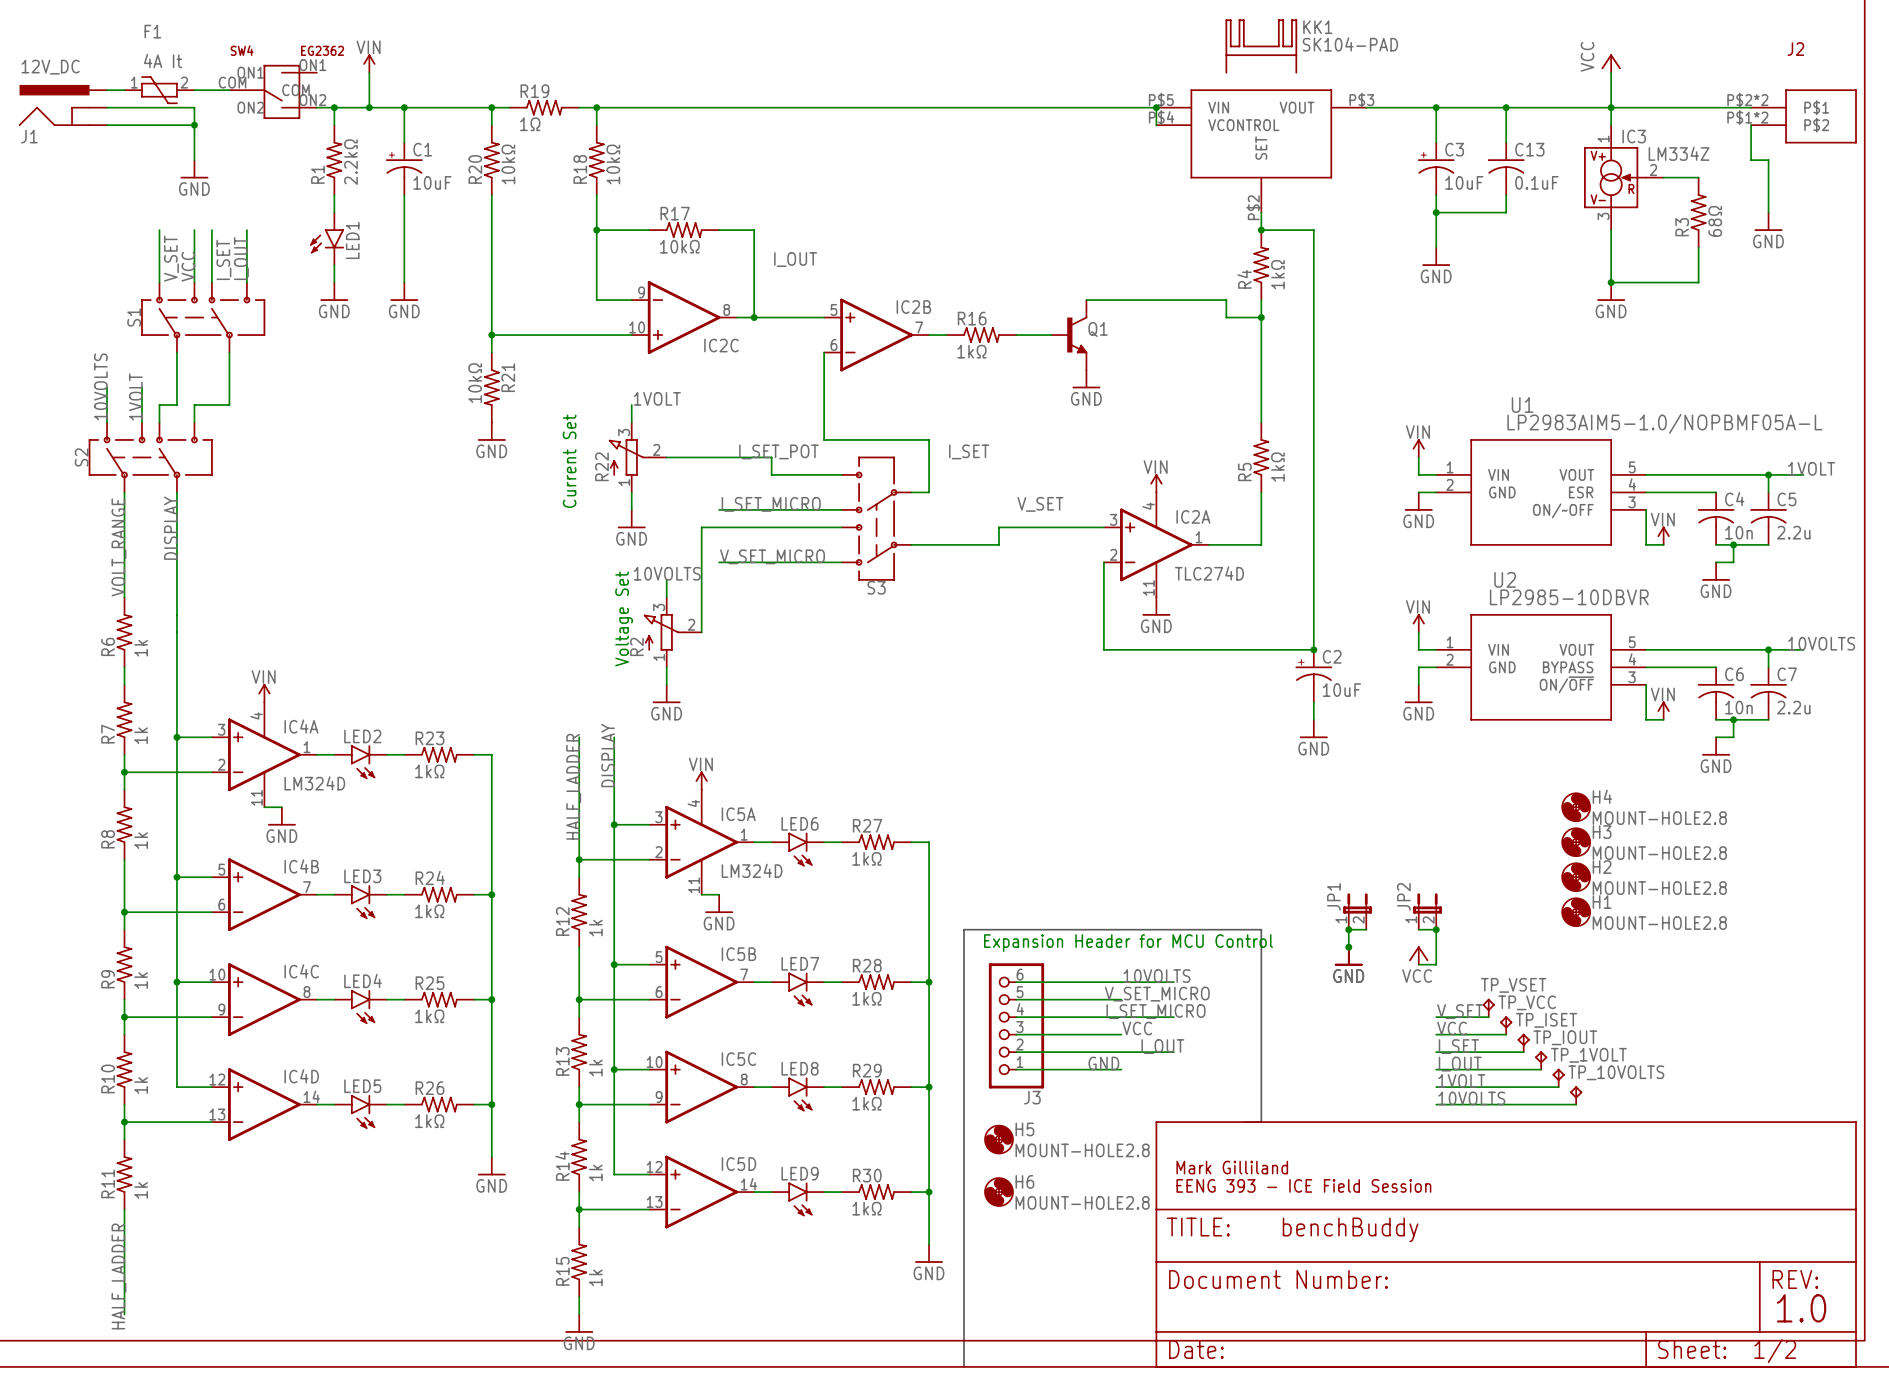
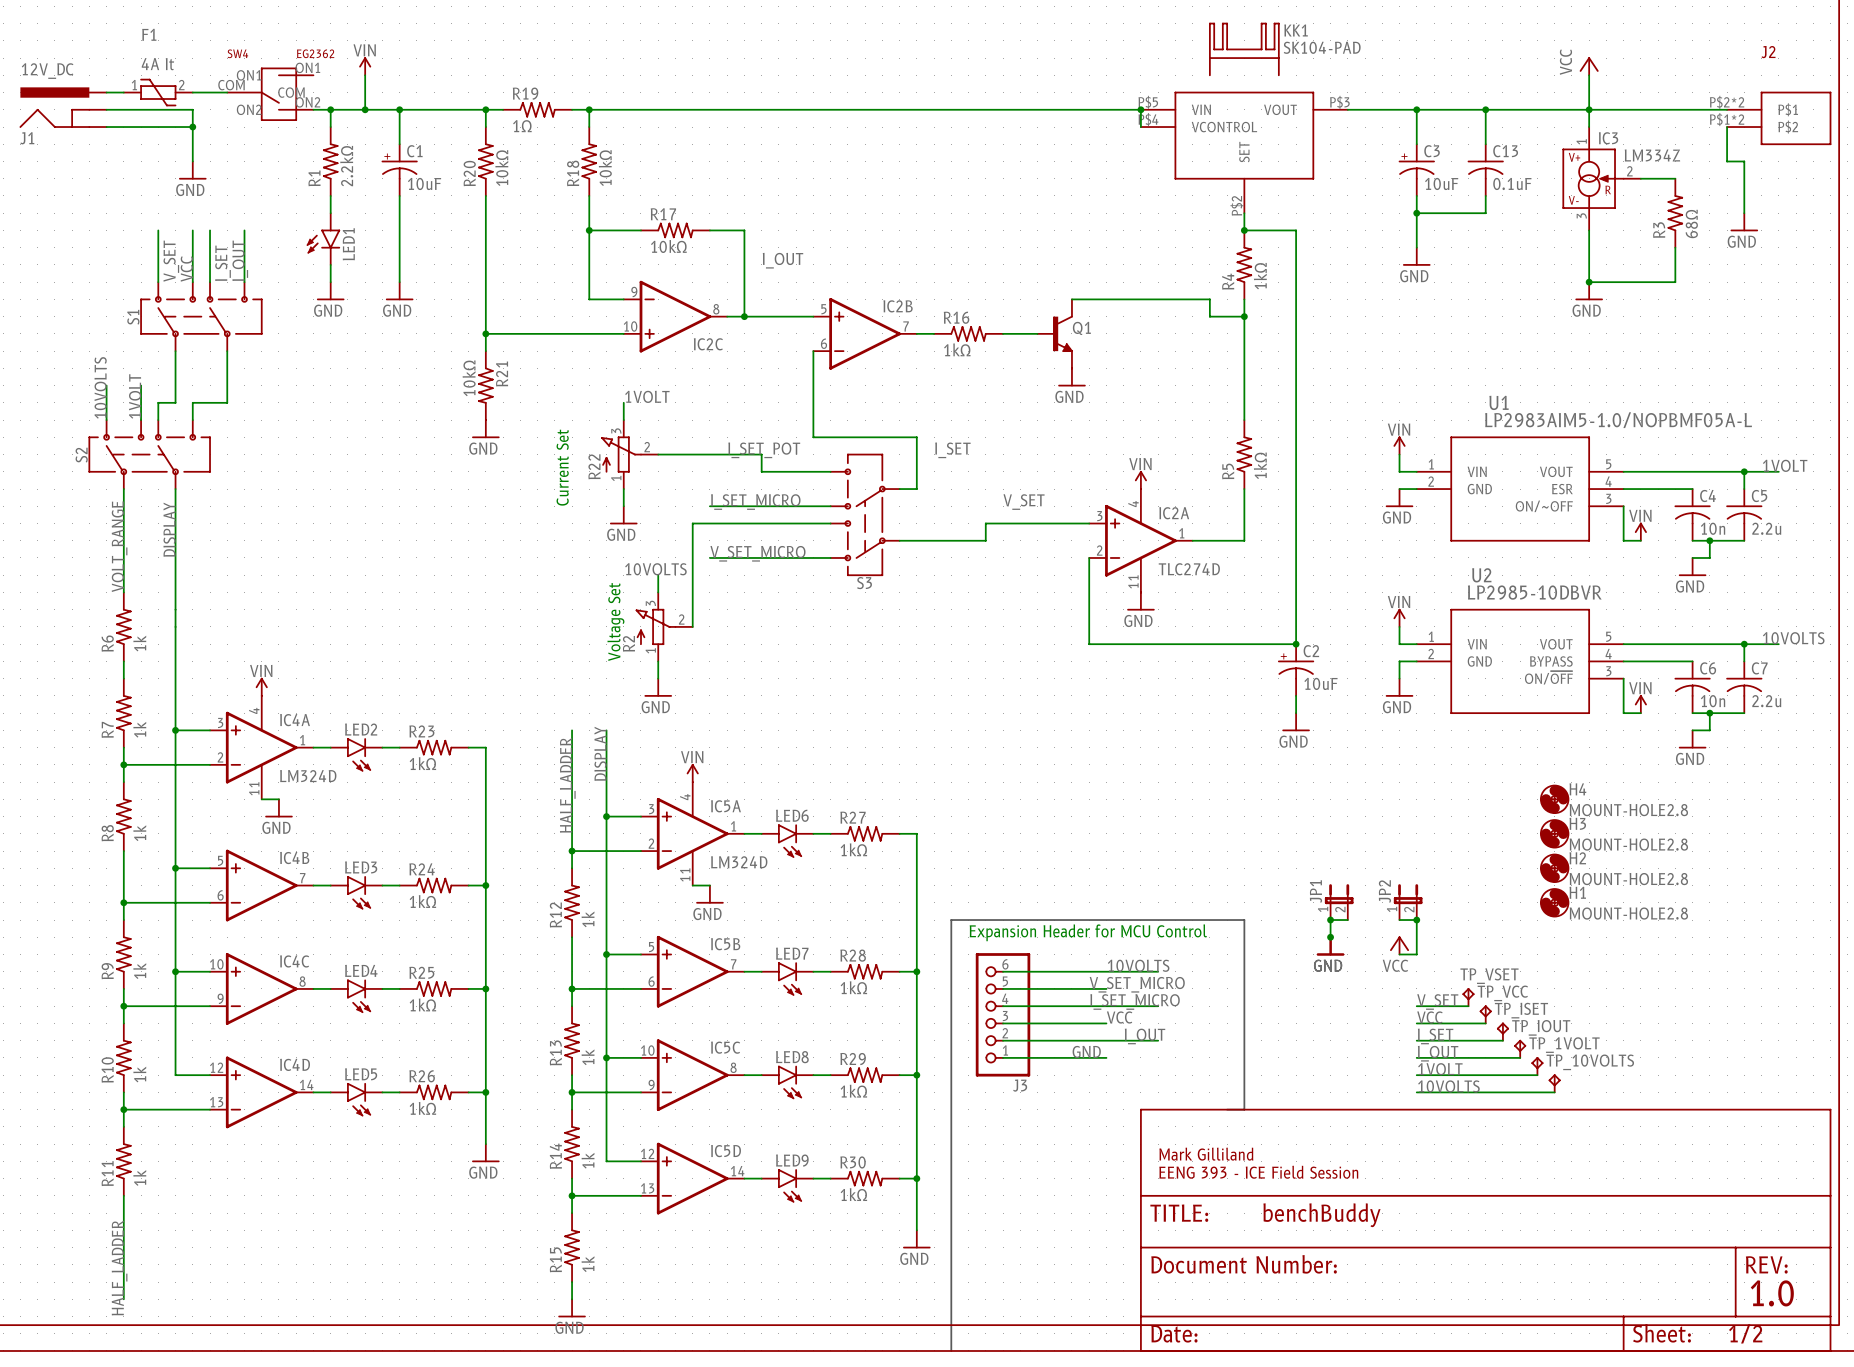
H5: MOUNT-HOLE2.8 (998, 1139) -> none
H6: MOUNT-HOLE2.8 (998, 1192) -> none

